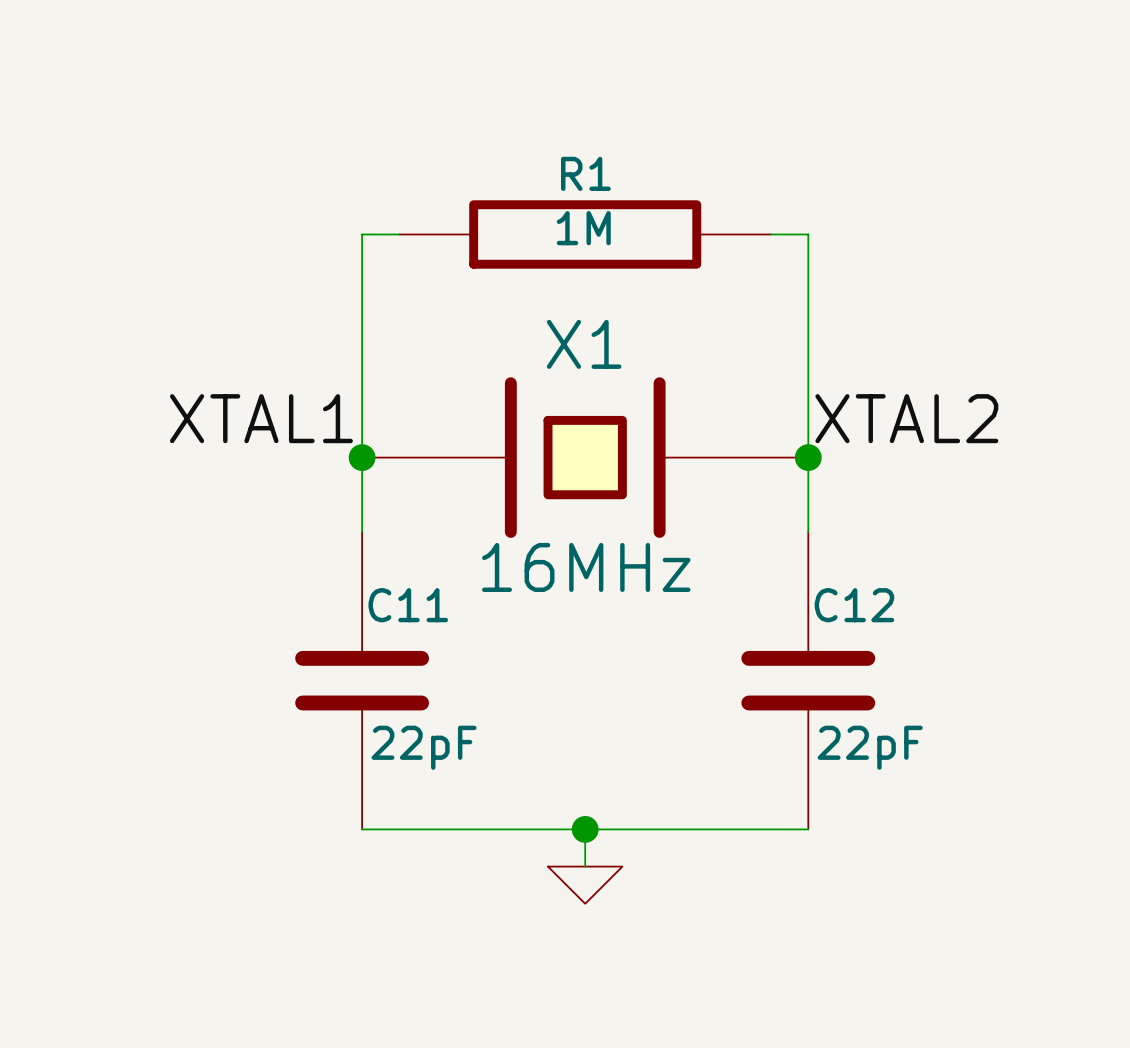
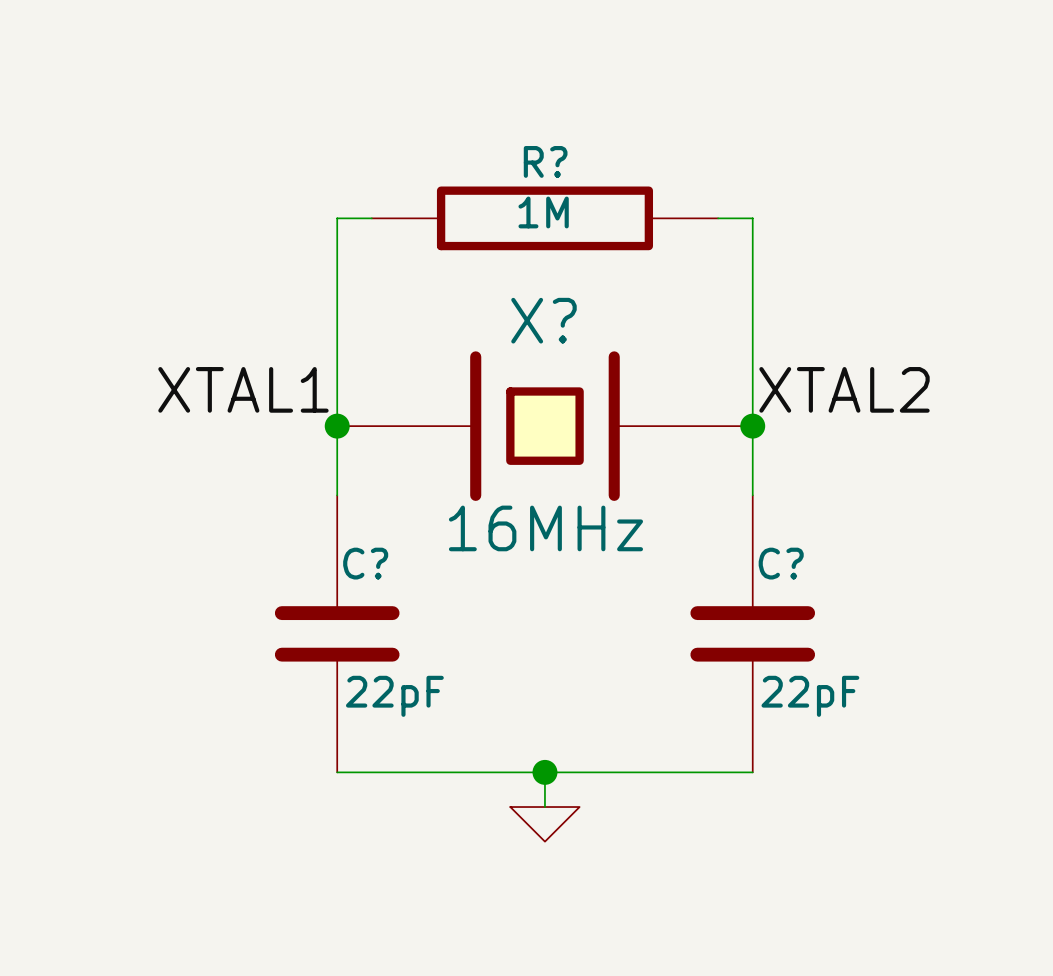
R1 name: R1 (585, 173) -> R? (545, 161)
X1 name: X1 (584, 344) -> X? (543, 320)
C11 name: C11 (408, 605) -> C? (365, 563)
C12 name: C12 (854, 605) -> C? (781, 563)

